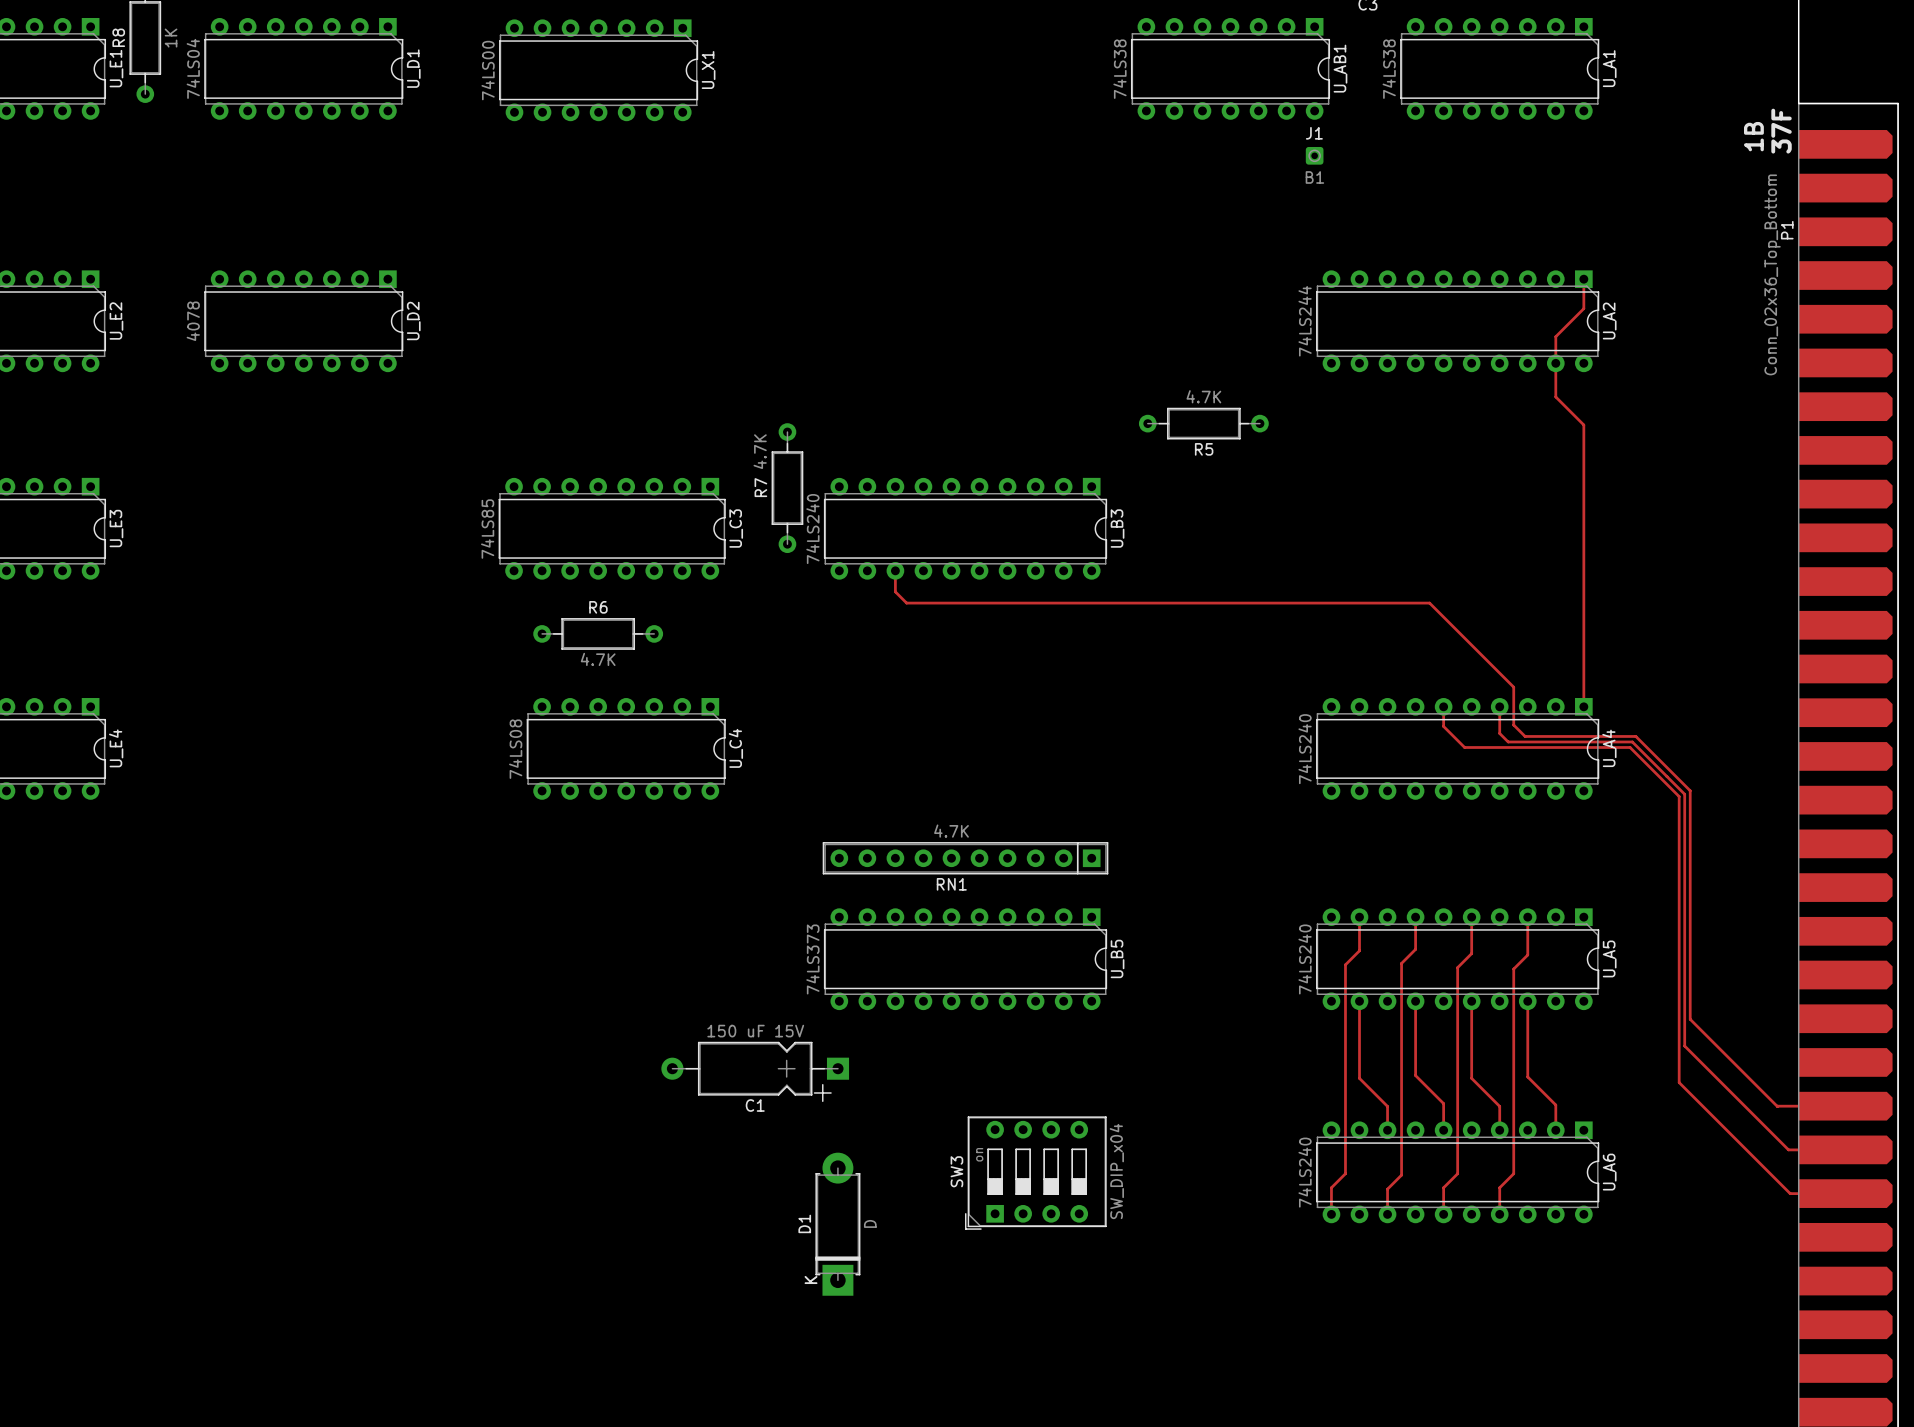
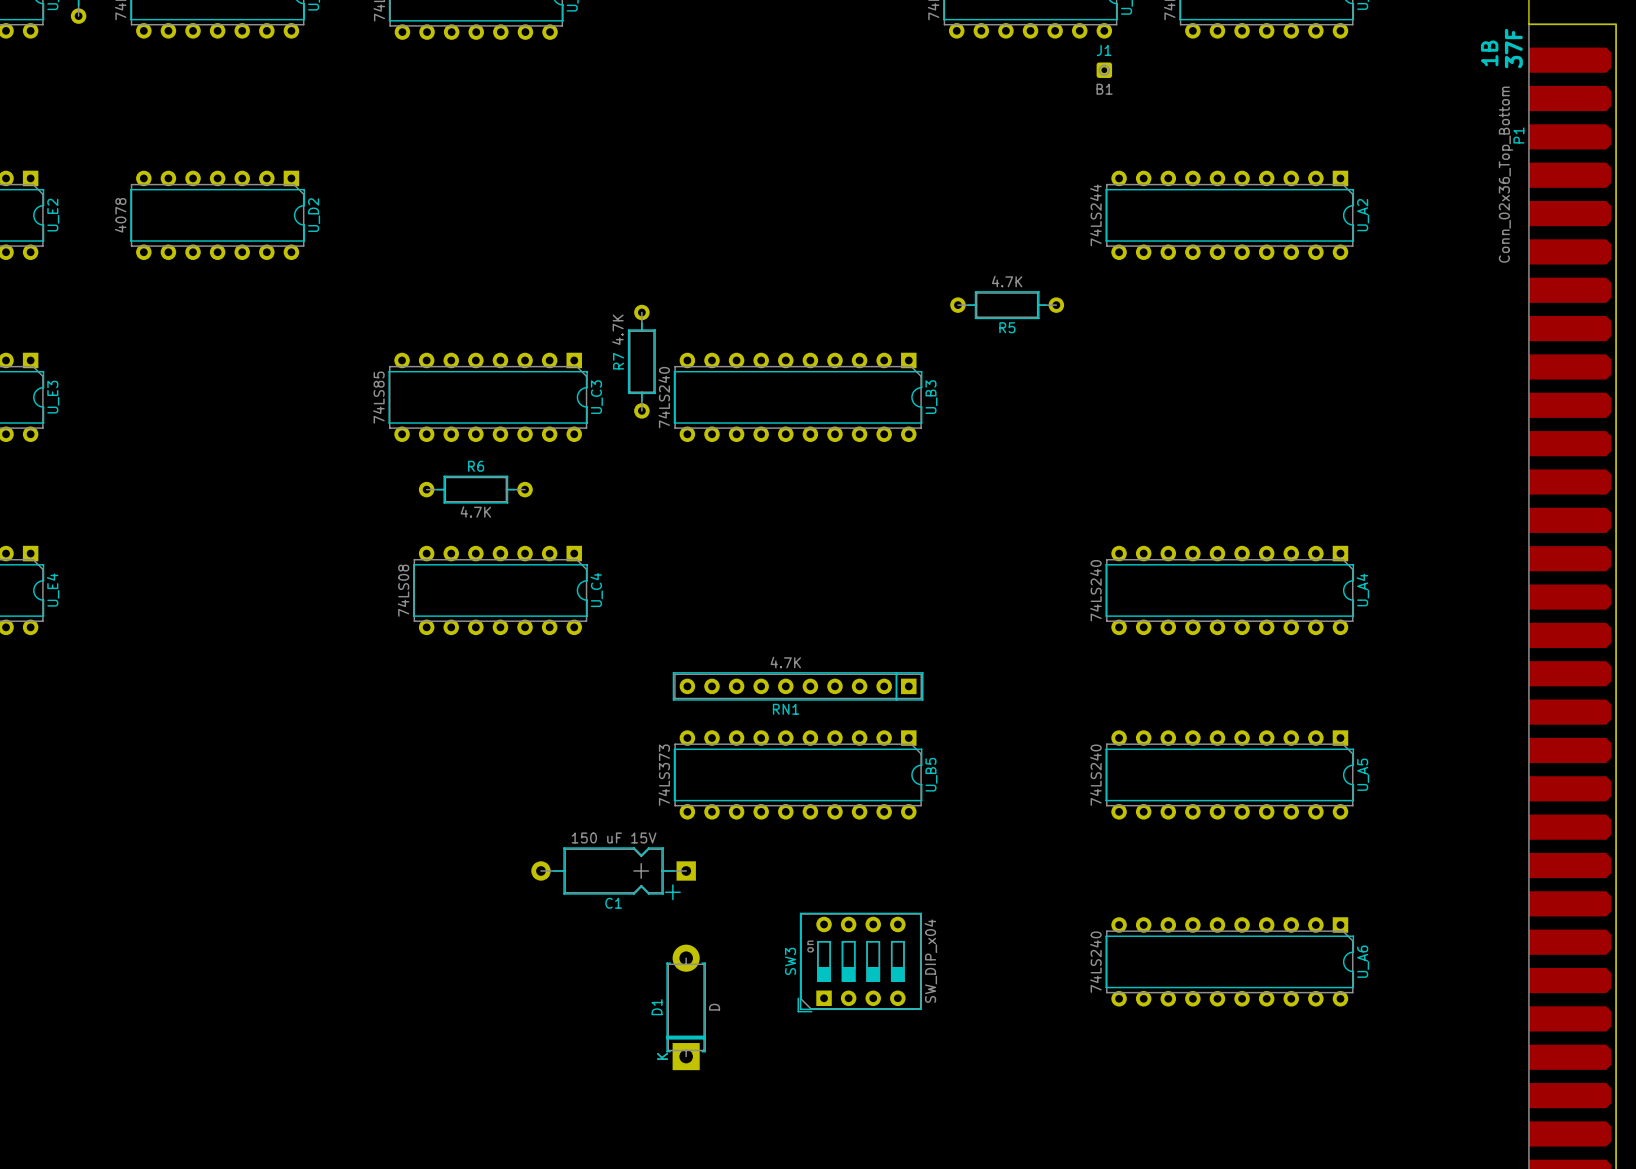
track: (1583, 279) (1583, 308) (1555, 336) (1555, 396) (1583, 425) (1583, 706) -> none
track: (895, 570) (895, 591) (906, 603) (1429, 603) (1513, 687) (1513, 725) (1525, 736) (1635, 736) (1690, 790) (1690, 1019) (1777, 1106) (1823, 1106) -> none
track: (1443, 706) (1443, 726) (1464, 747) (1630, 747) (1679, 796) (1679, 1082) (1790, 1193) (1823, 1193) -> none
track: (1499, 706) (1499, 733) (1508, 741) (1632, 741) (1684, 794) (1684, 1046) (1788, 1149) (1823, 1149) -> none
track: (1359, 917) (1359, 950) (1345, 964) (1345, 1173) (1331, 1187) (1331, 1214) -> none
track: (1415, 917) (1415, 949) (1401, 963) (1401, 1175) (1387, 1189) (1387, 1214) -> none
track: (1471, 917) (1471, 953) (1457, 967) (1457, 1173) (1443, 1187) (1443, 1214) -> none
track: (1527, 917) (1527, 955) (1513, 969) (1513, 1173) (1499, 1187) (1499, 1214) -> none
track: (1359, 1001) (1359, 1078) (1387, 1106) (1387, 1130) -> none
track: (1415, 1001) (1415, 1075) (1443, 1103) (1443, 1130) -> none
track: (1471, 1001) (1471, 1078) (1499, 1106) (1499, 1130) -> none
track: (1527, 1001) (1527, 1076) (1555, 1105) (1555, 1130) -> none

